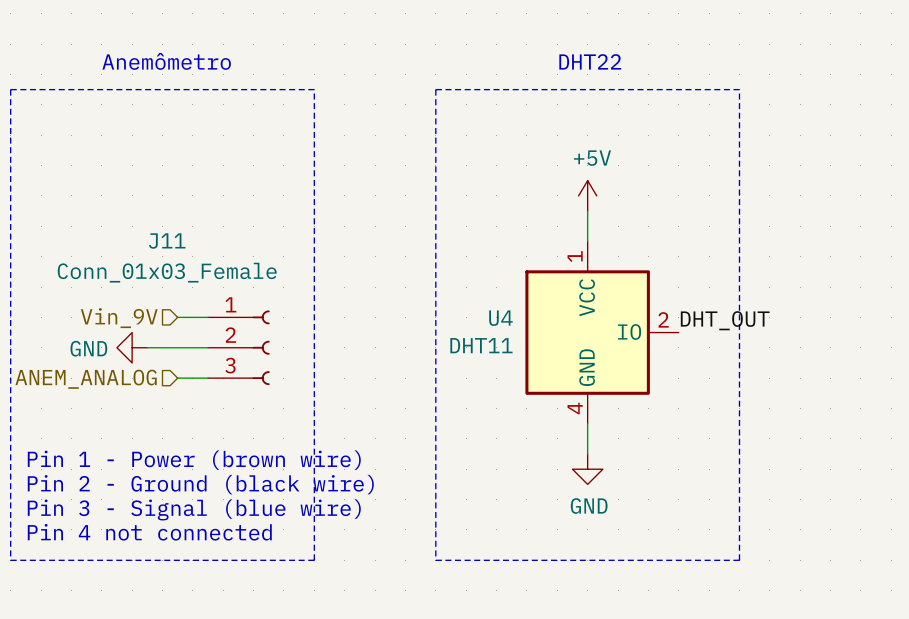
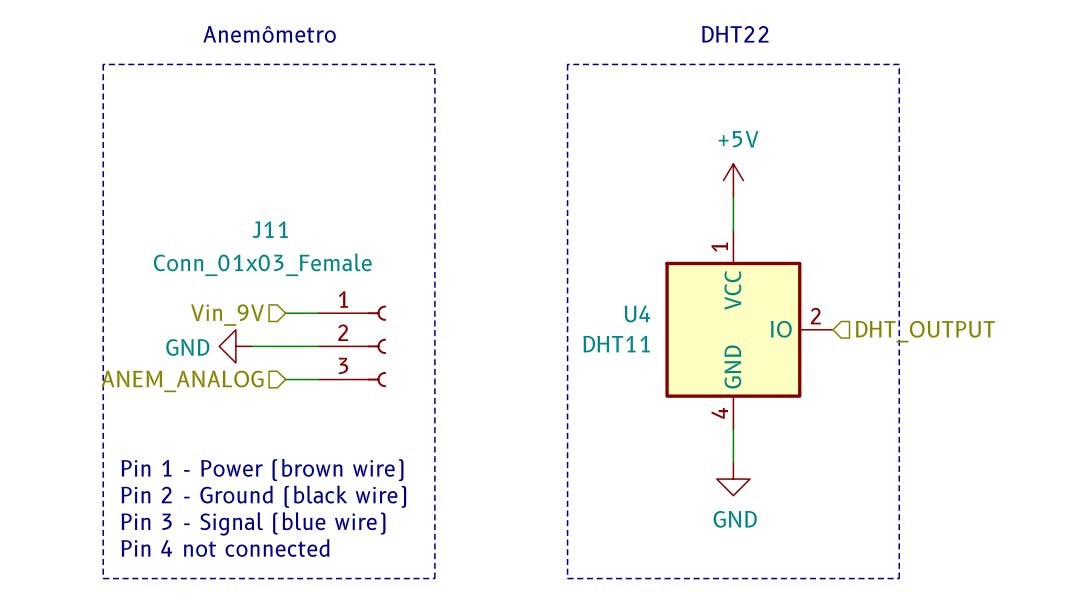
label: DHT_OUT (725, 320) -> none
hierarchical label: none -> DHT_OUTPUT (925, 331)

